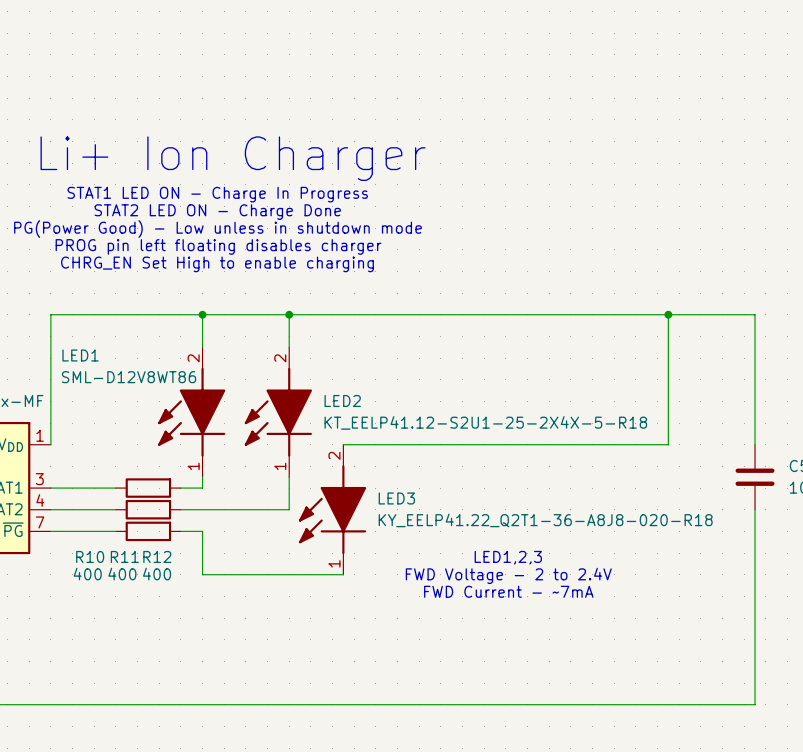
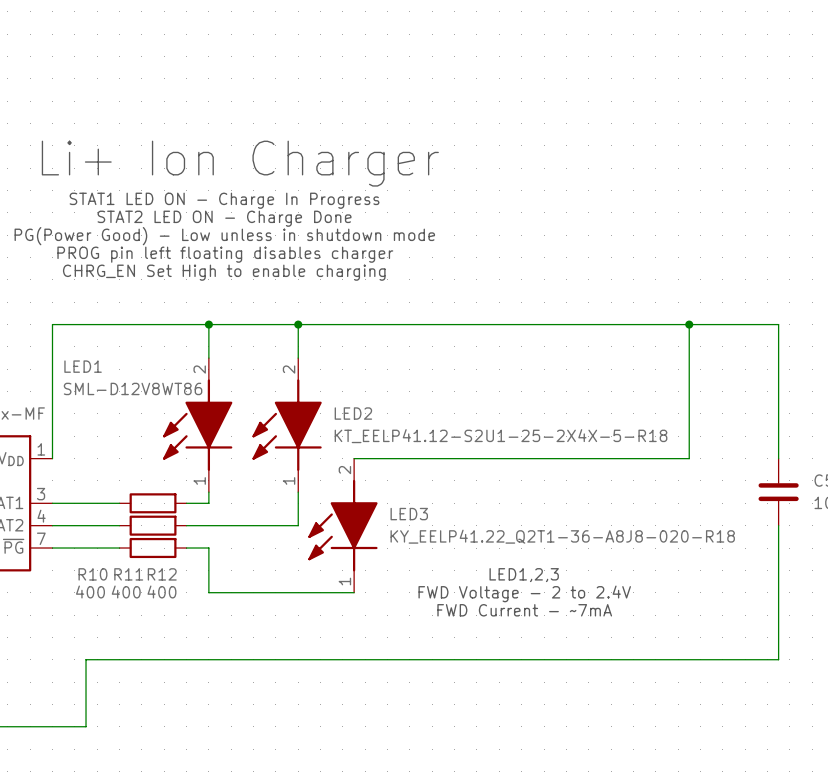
wire: (755, 639) (755, 704) (83, 704) -> (778, 659) (86, 659) (86, 726)

